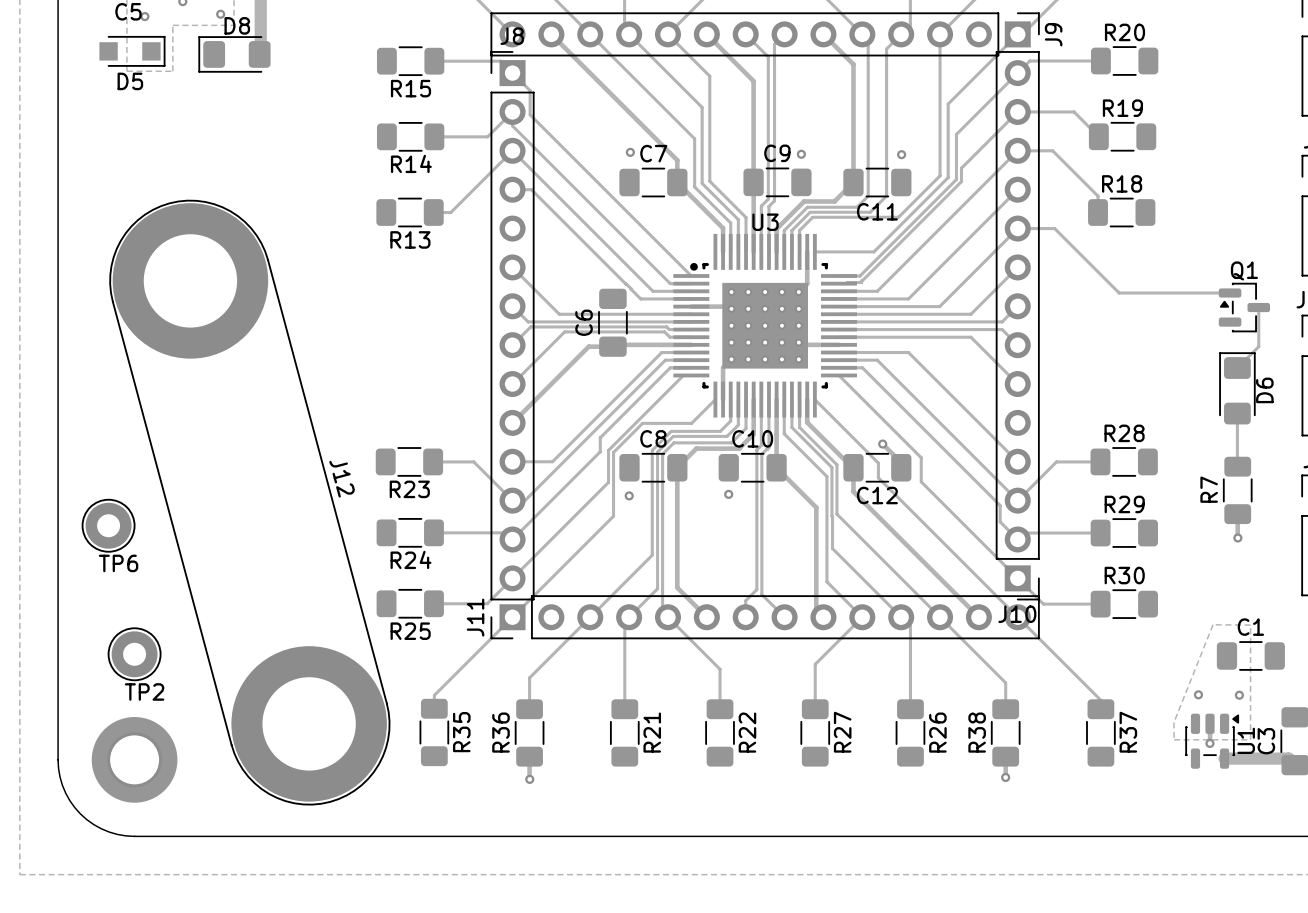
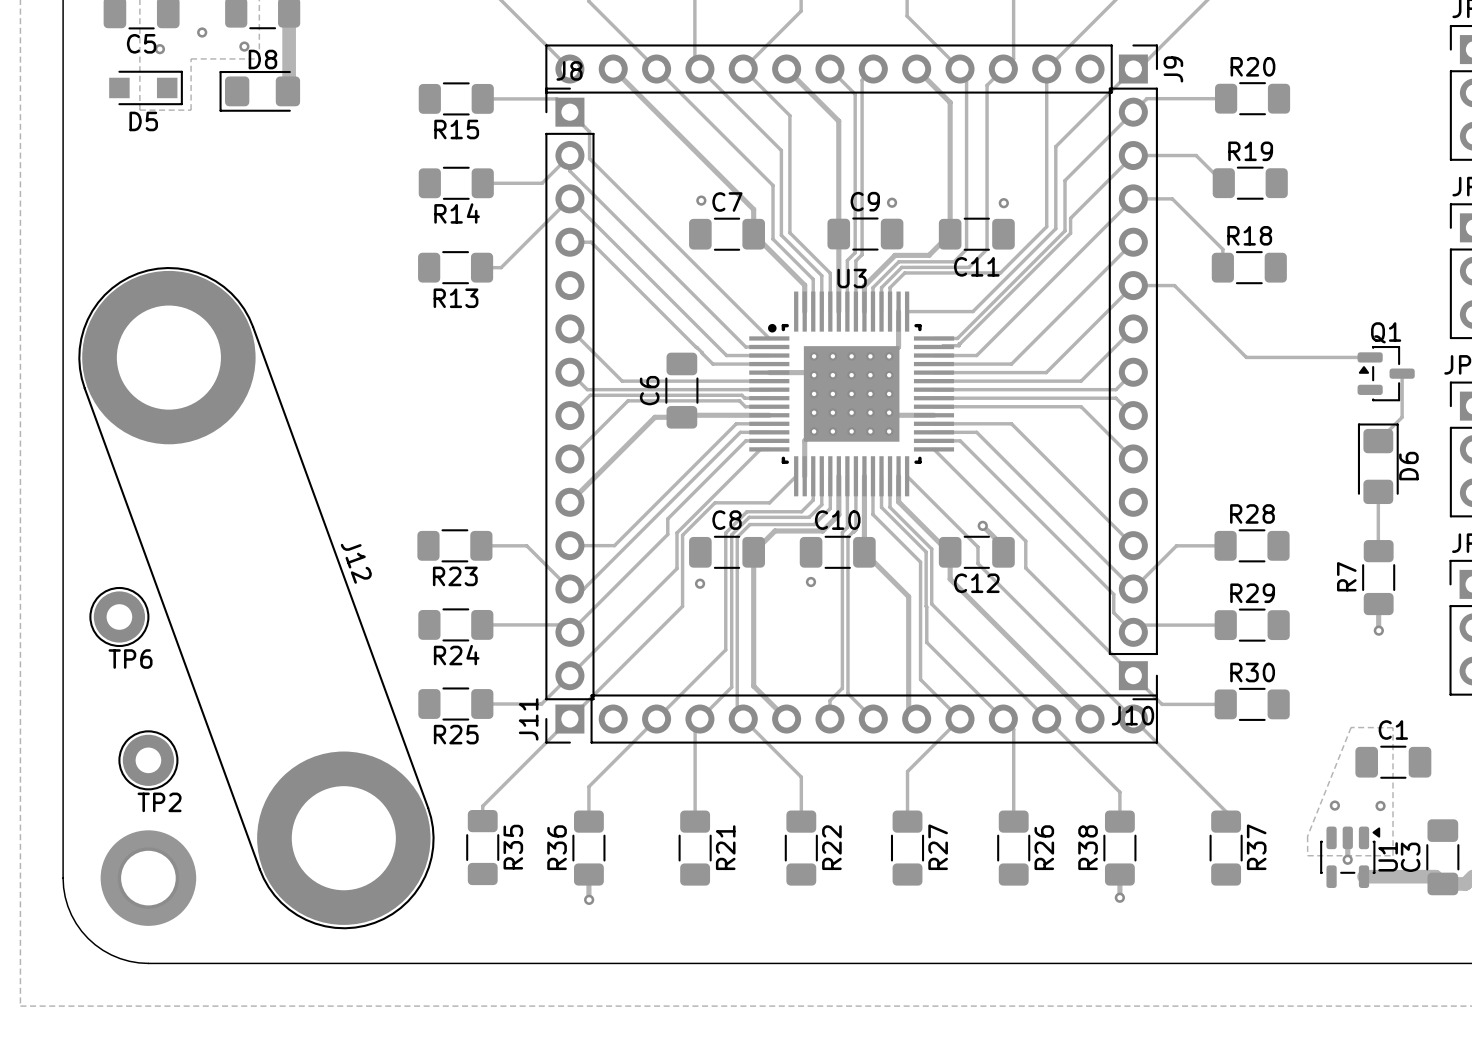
J12 rotation: 0° (249, 502) -> 5° counterclockwise (256, 598)

